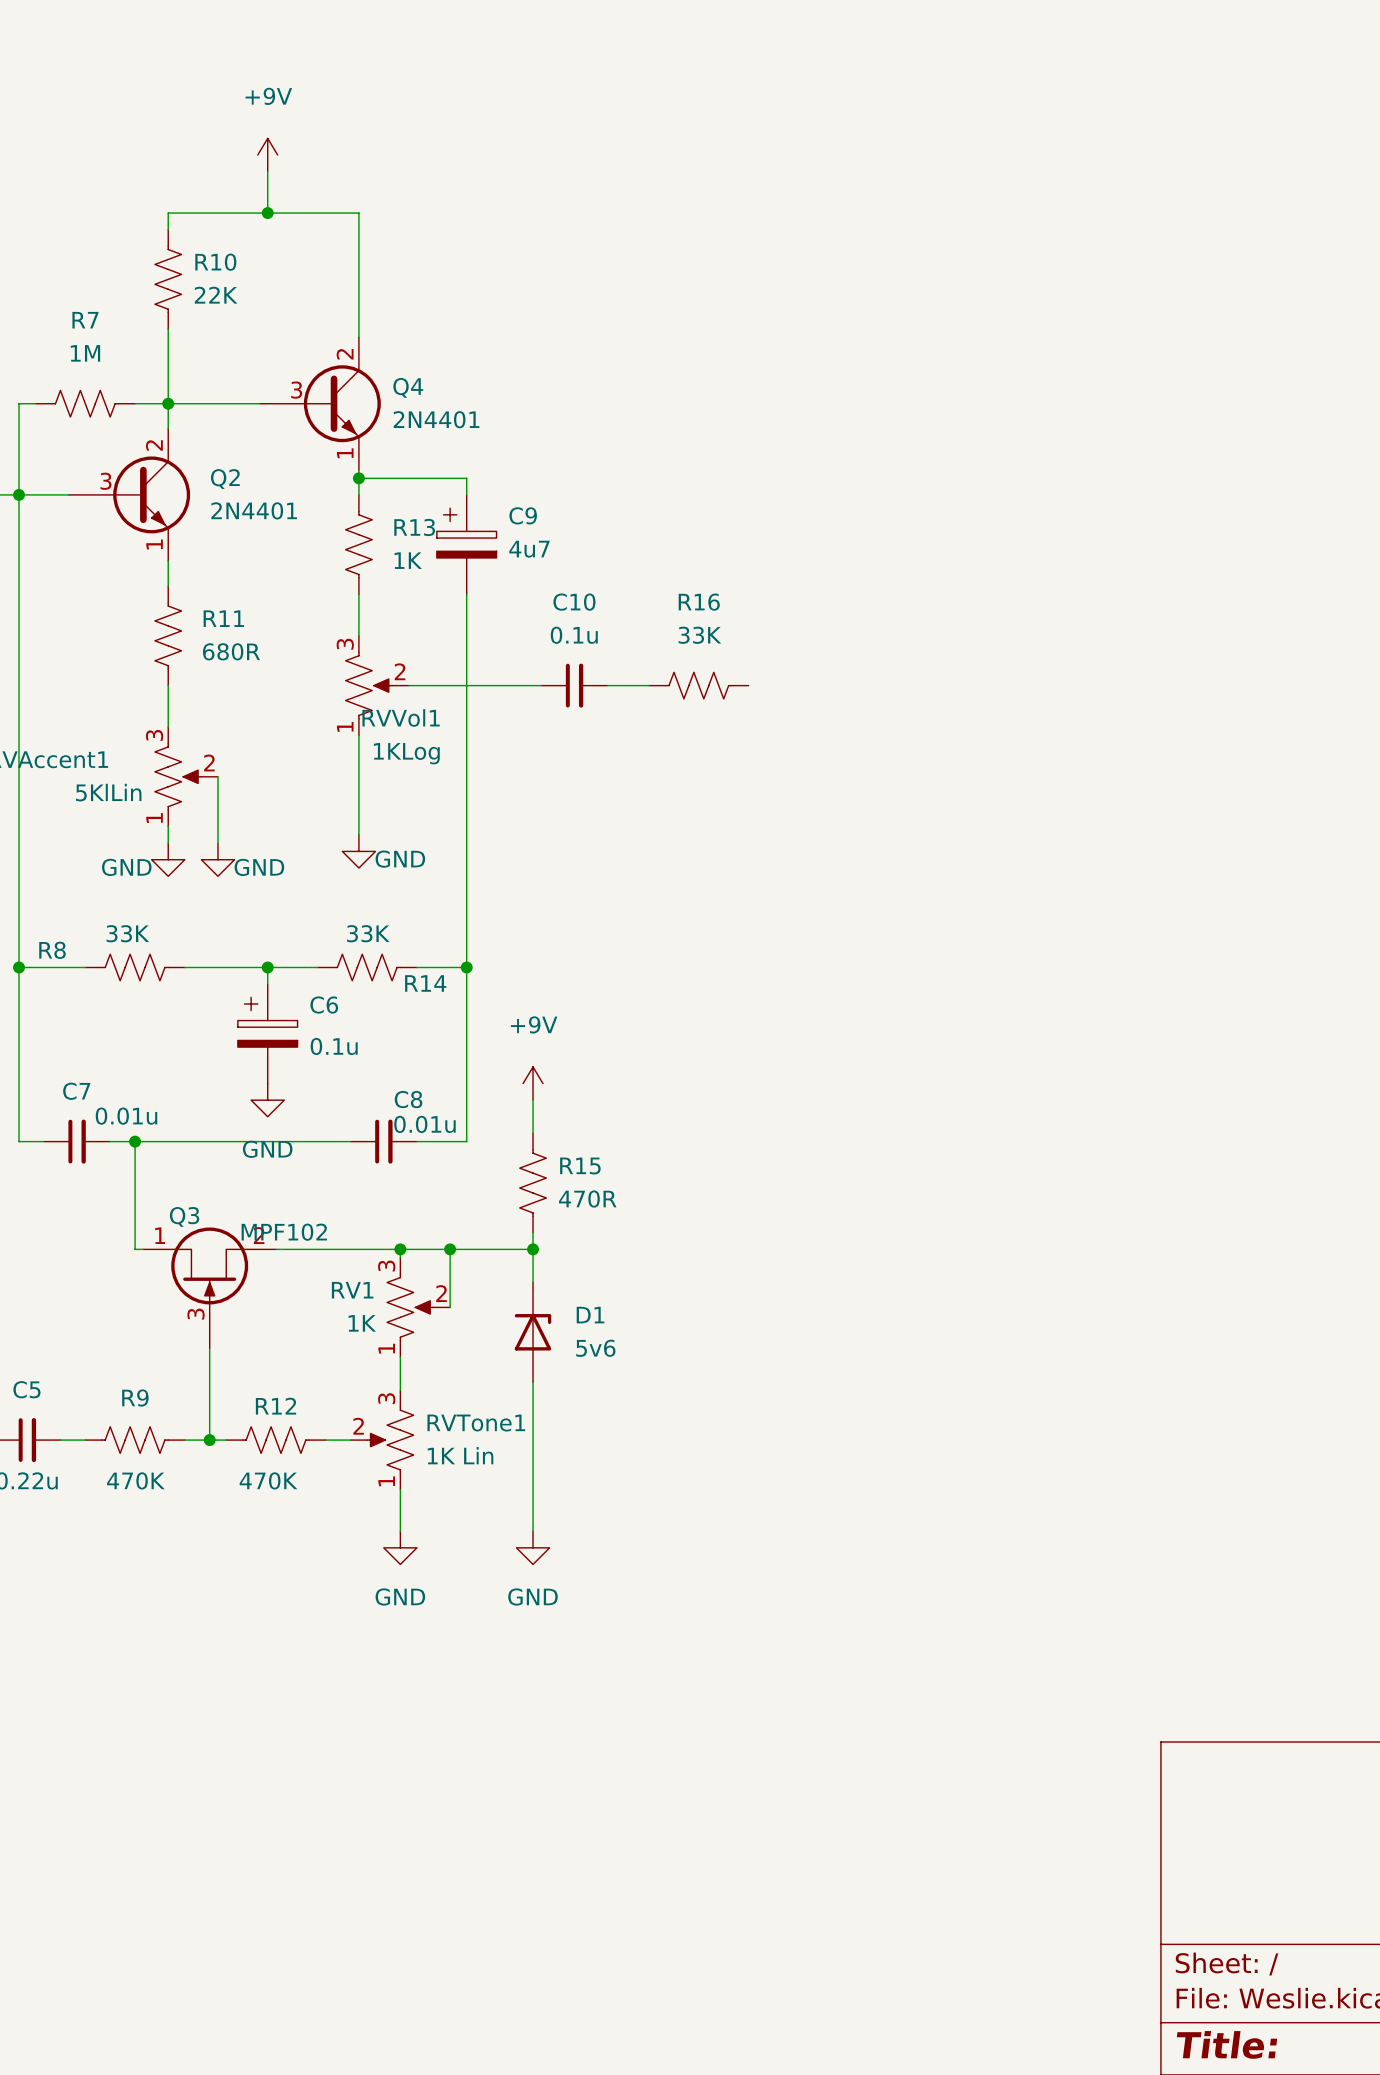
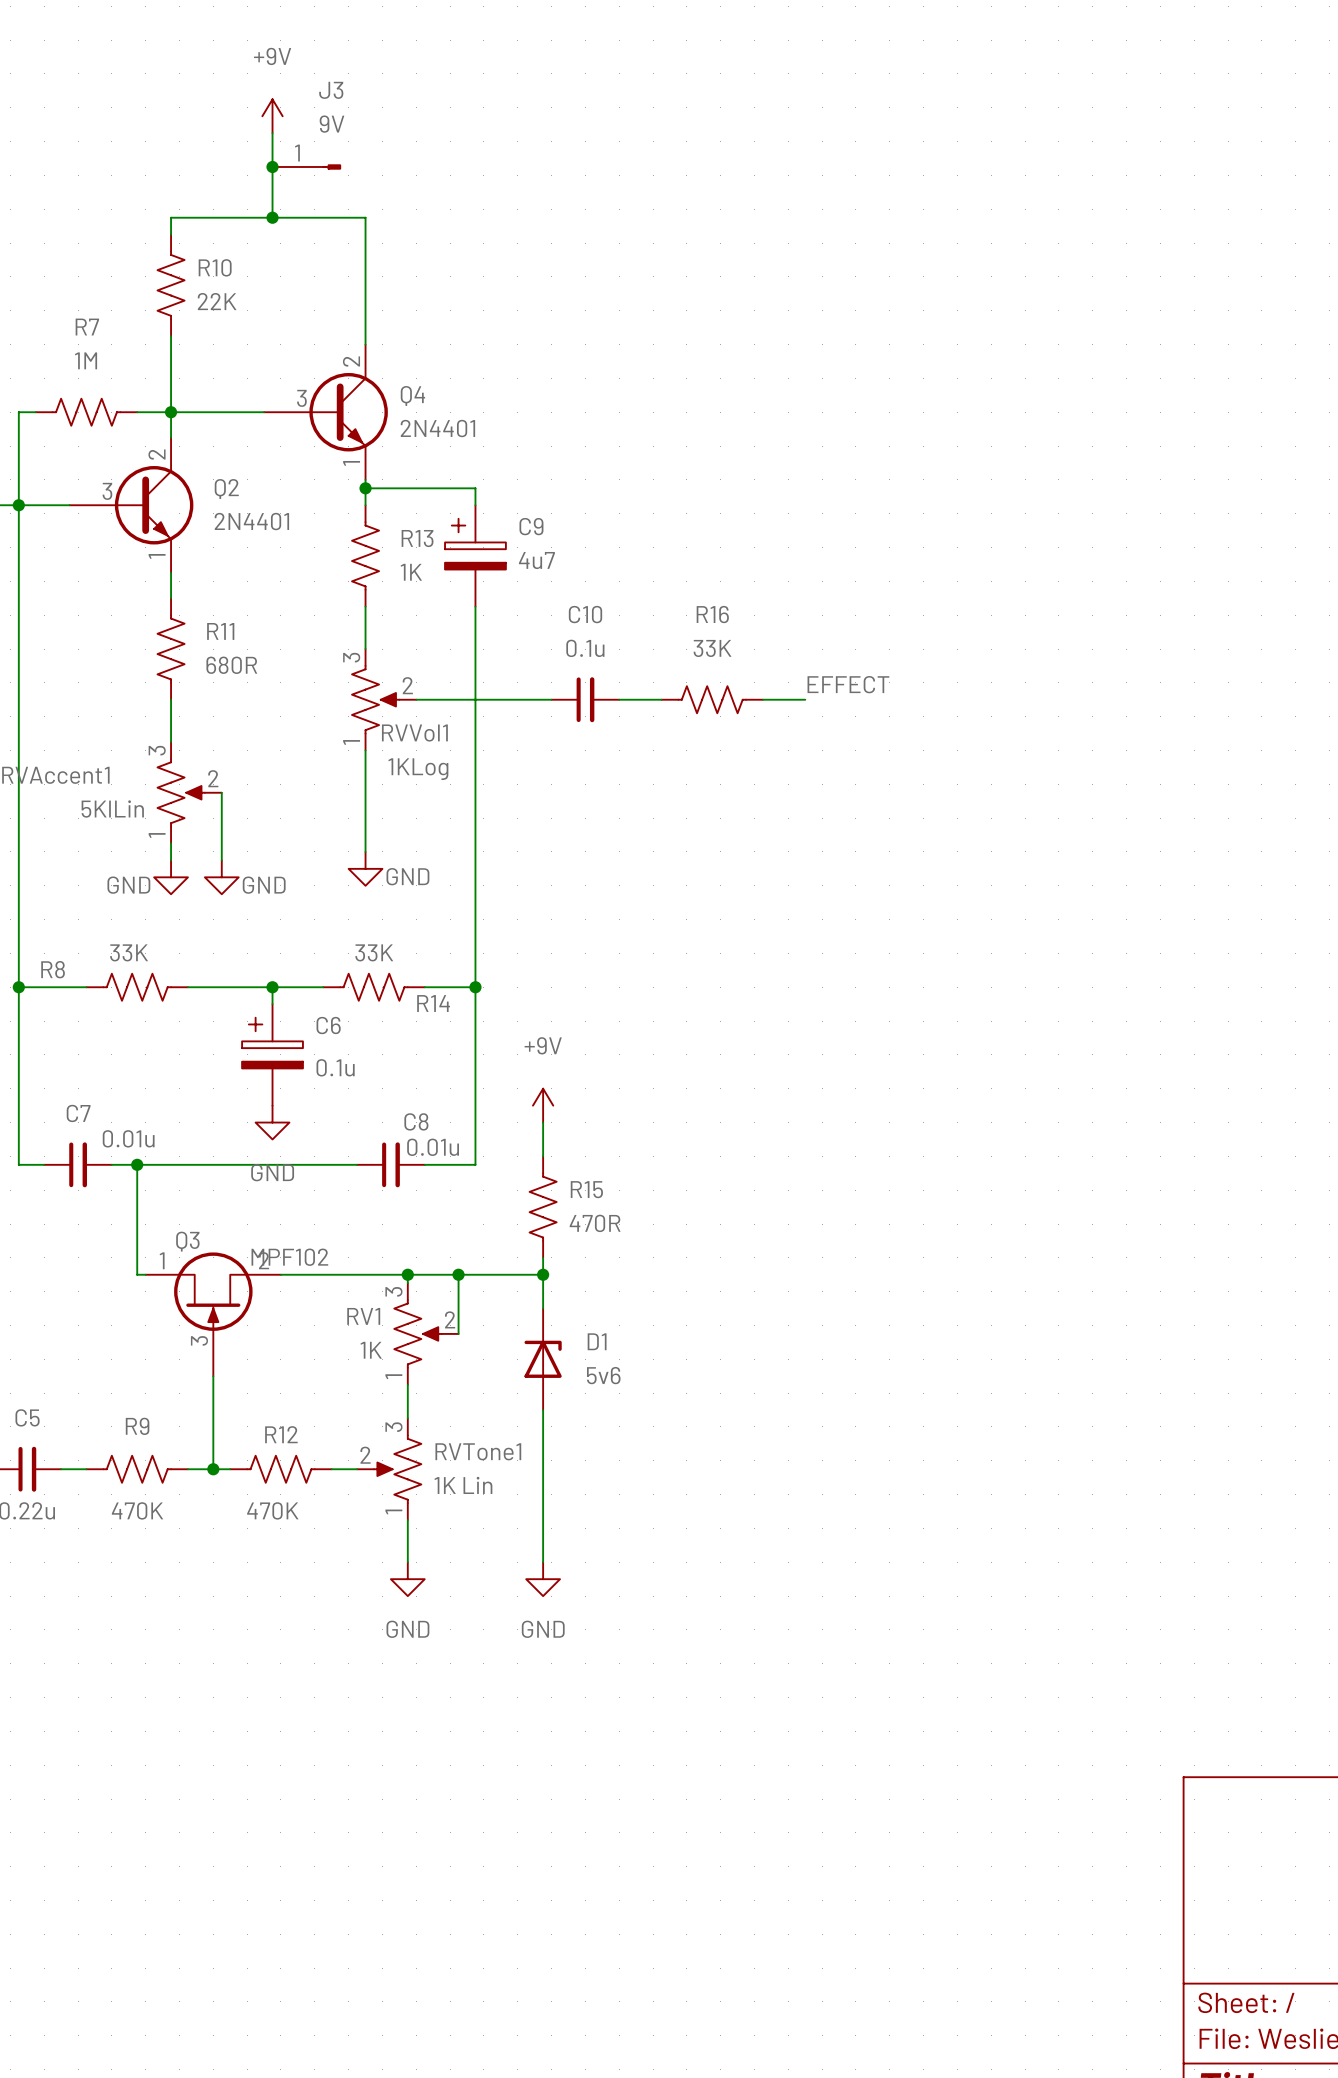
power symbol position: +9V (267, 155) -> +9V (272, 116)
junction: none -> (272, 166)
J3: none -> 9V (306, 166)
label: none -> EFFECT (848, 684)
wire: none -> (762, 699) (805, 699)

